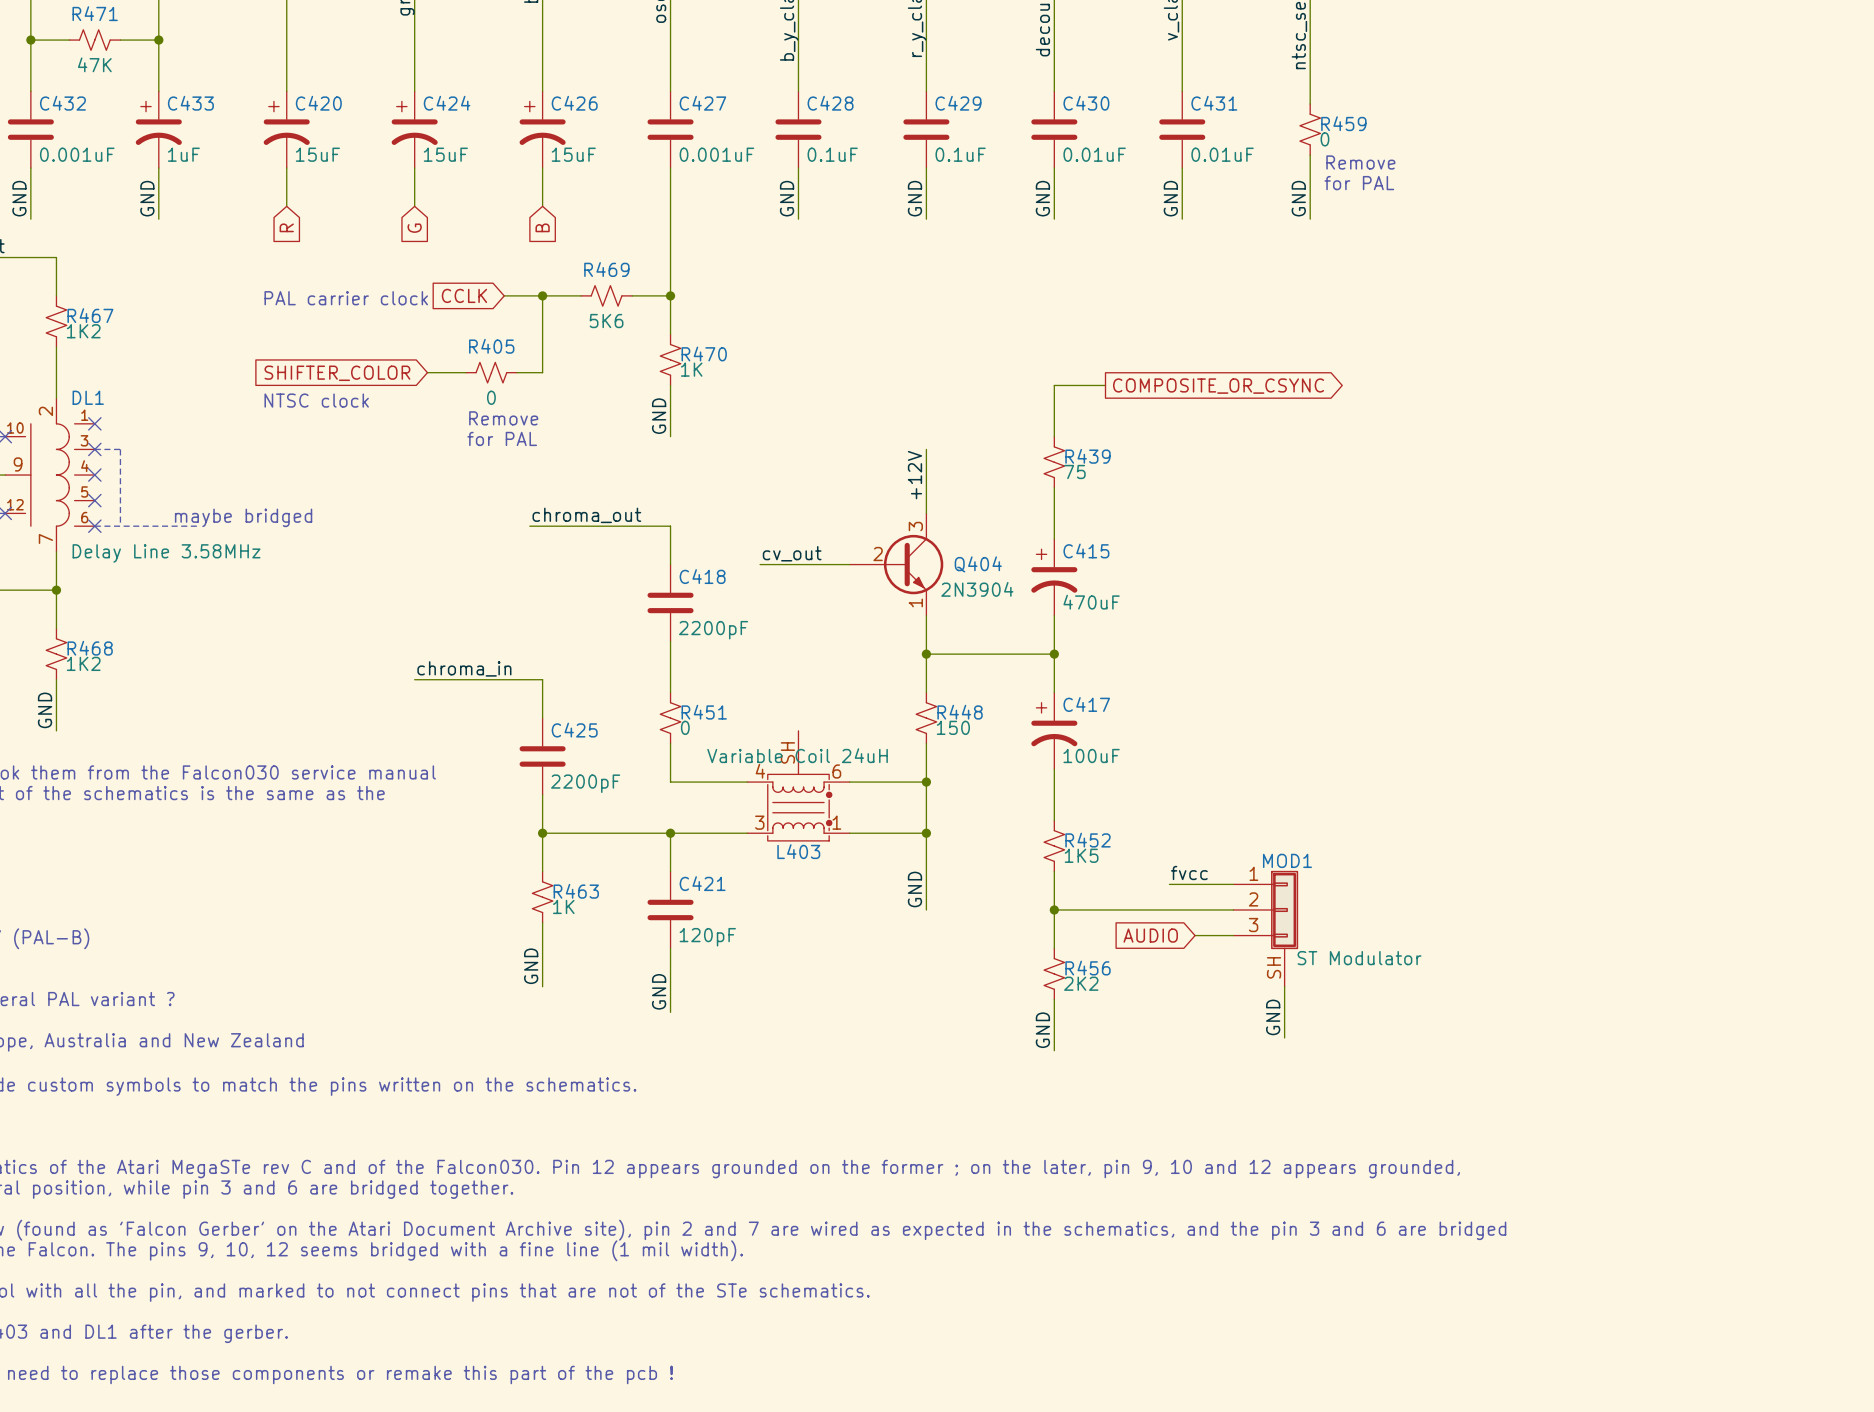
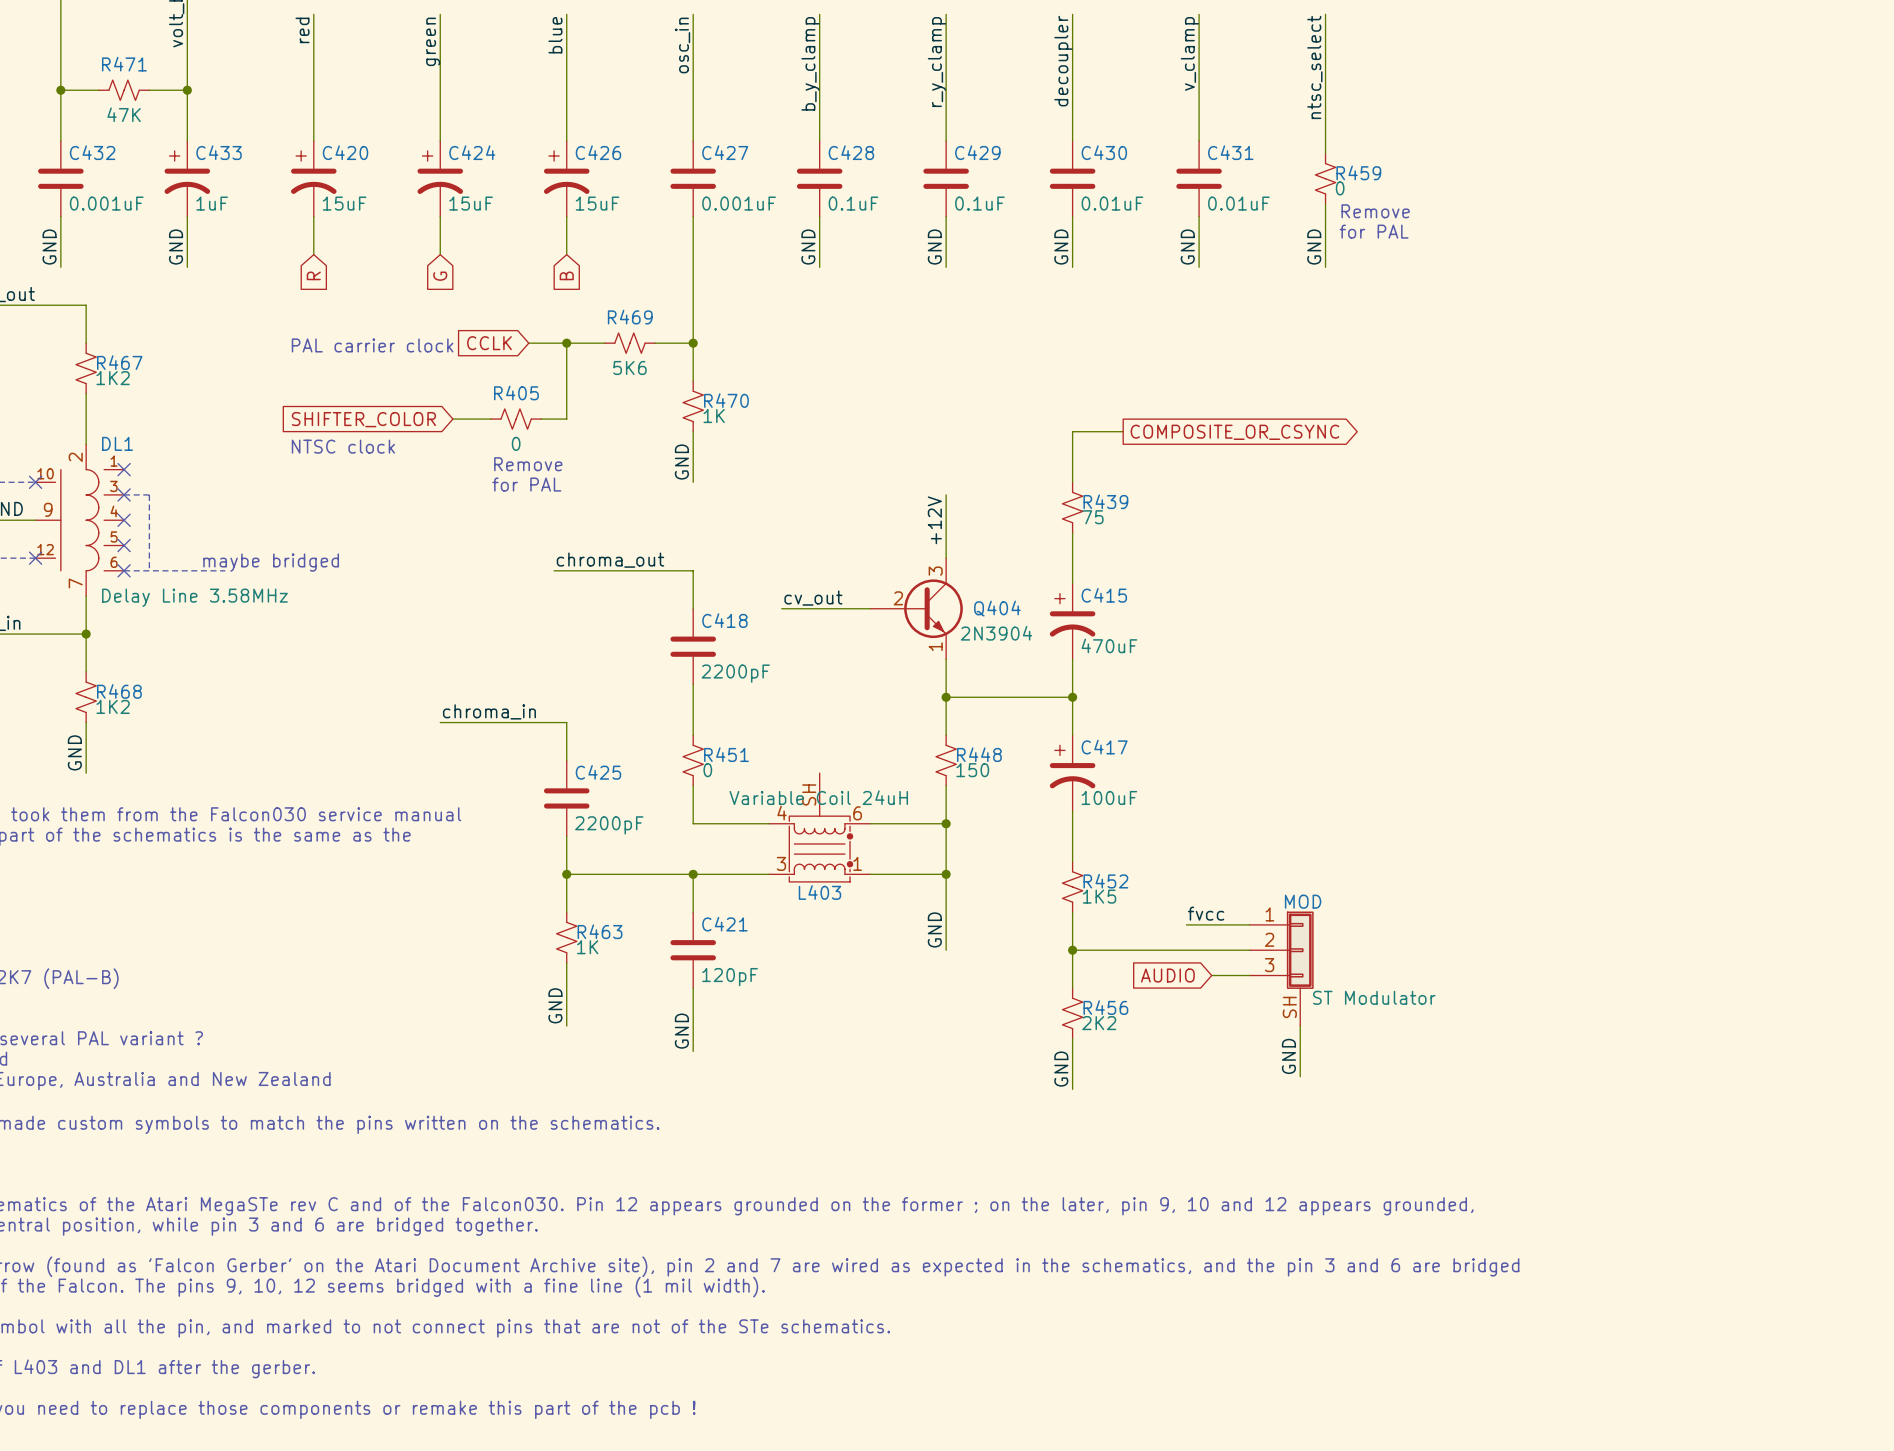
MOD1 name: MOD1 (1287, 860) -> MOD (1303, 901)

